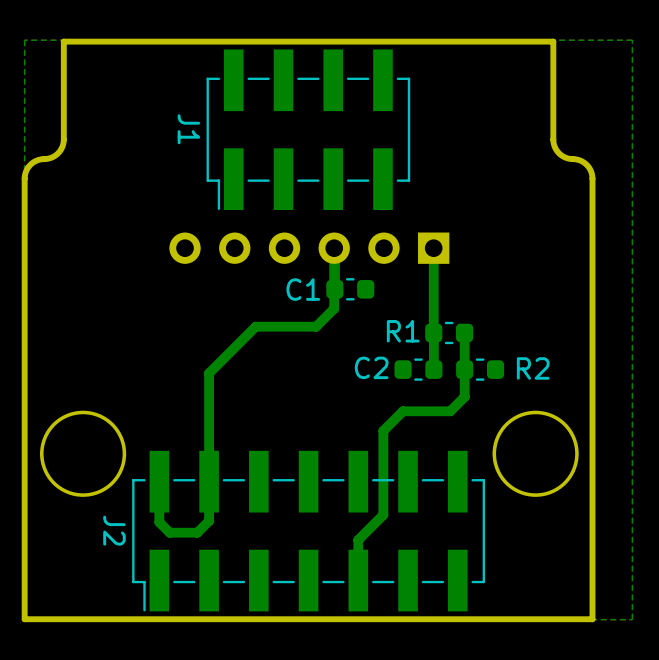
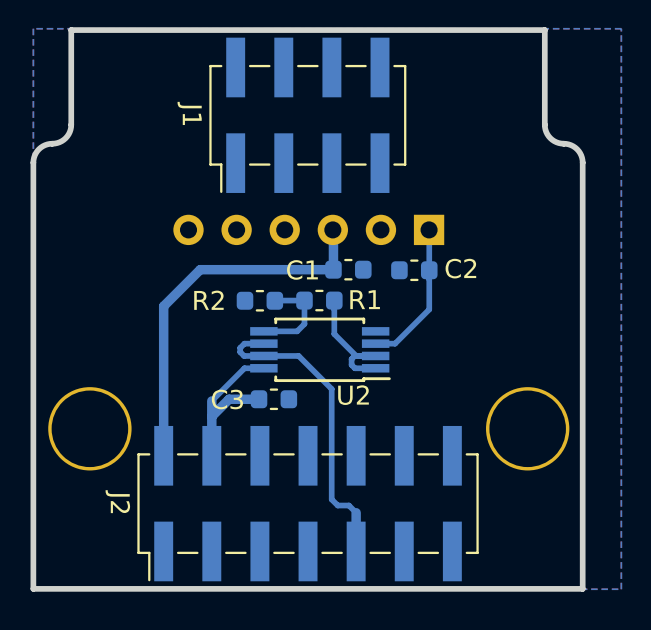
bottom track: (334, 248) (334, 308) (316, 326) (255, 326) (209, 373) (209, 425) -> (263, 368) (244, 368) (211, 400)
bottom track: (433, 248) (433, 332) -> (429, 230) (429, 309) (395, 343) (375, 343)
bottom track: none -> (333, 269) (200, 269) (163, 306) (163, 455)
bottom track: none -> (275, 300) (304, 300) (304, 324) (297, 331) (263, 331)
bottom track: none -> (334, 300) (334, 334) (356, 355)
R1 name position: R1 (403, 331) -> R1 (365, 299)
R1 position: (449, 332) -> (319, 300)
bottom track: (433, 333) (433, 369) -> none
bottom track: (464, 333) (464, 396) (450, 411) (402, 411) (383, 430) (383, 514) (358, 540) -> (263, 343) (244, 343) (240, 347) (240, 352) (244, 355) (298, 355) (331, 389) (331, 499) (337, 505) (348, 505) (356, 512)
C2 name position: C2 (371, 367) -> C2 (460, 268)
R2 name position: R2 (533, 368) -> R2 (208, 300)
C2 position: (418, 369) -> (414, 270)
R2 position: (480, 369) -> (259, 300)
U2: none -> (320, 349)
bottom track: none -> (375, 355) (354, 355) (351, 359) (351, 364) (354, 368) (375, 368)
C3: none -> (273, 399)
bottom track: (209, 481) (209, 520) (197, 532) (169, 532) (159, 522) (159, 481) -> (211, 455) (211, 416) (229, 399) (259, 399)

